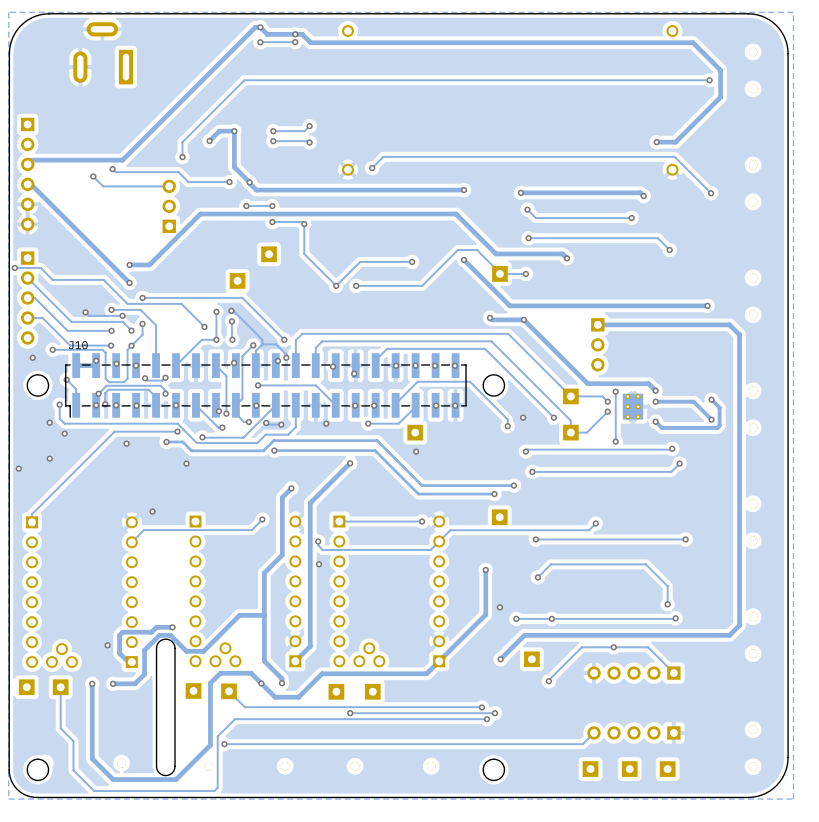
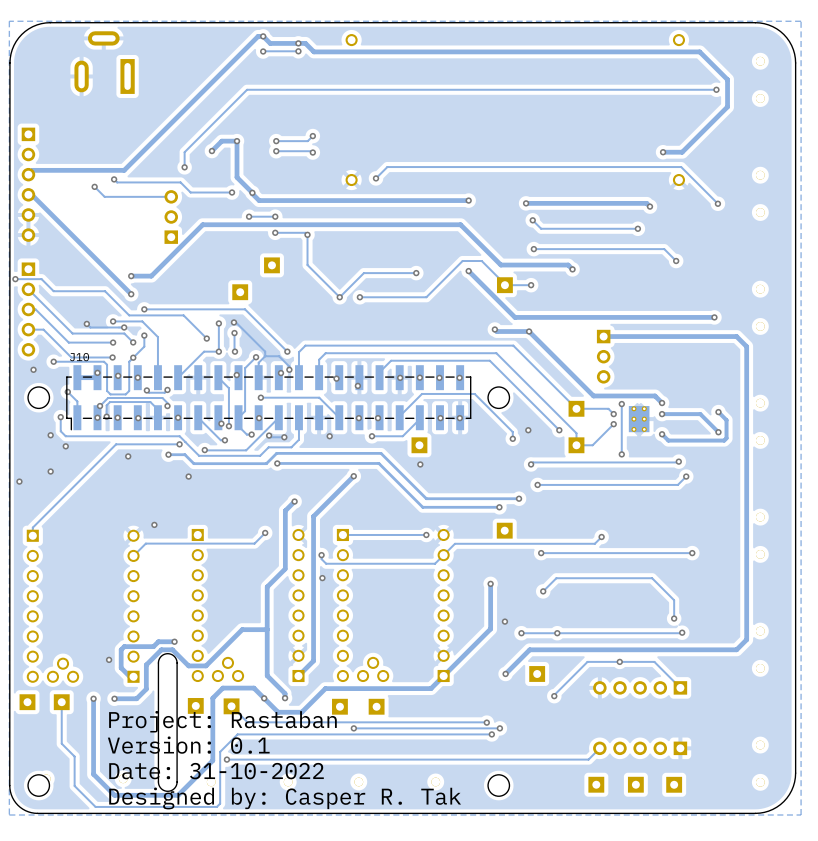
text: none -> Project: Rastaban (222, 721)
text: none -> Version: 0.1 (188, 745)
text: none -> Date: 31-10-2022 (216, 771)
text: none -> Designed by: Casper R. Tak (285, 798)

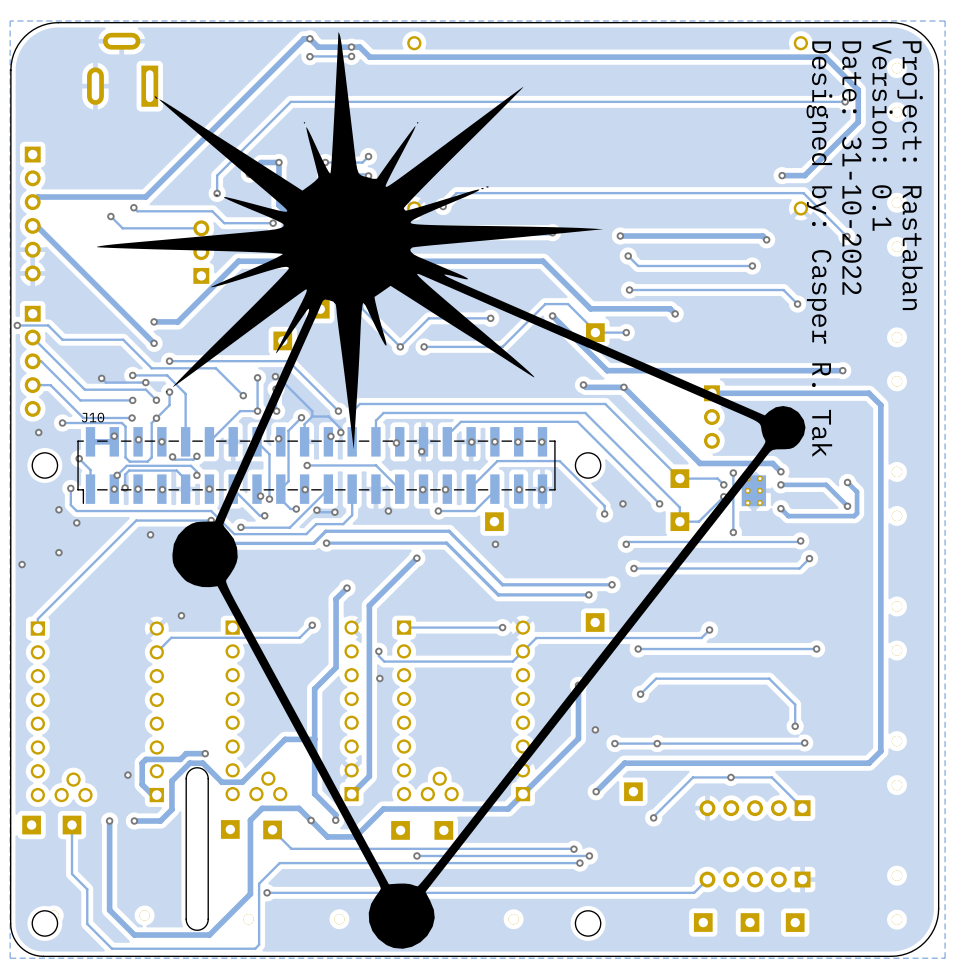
drawing: none -> [96, 32, 806, 949]
text: none -> Version: 0.1 (882, 135)
text: none -> Date: 31-10-2022 (851, 168)
text: none -> Project: Rastaban (910, 175)
text: none -> Designed by: Casper R. Tak (819, 249)
text: Project: Rastaban (222, 721) -> none
text: Version: 0.1 (188, 745) -> none
text: Date: 31-10-2022 (216, 771) -> none
text: Designed by: Casper R. Tak (285, 798) -> none

